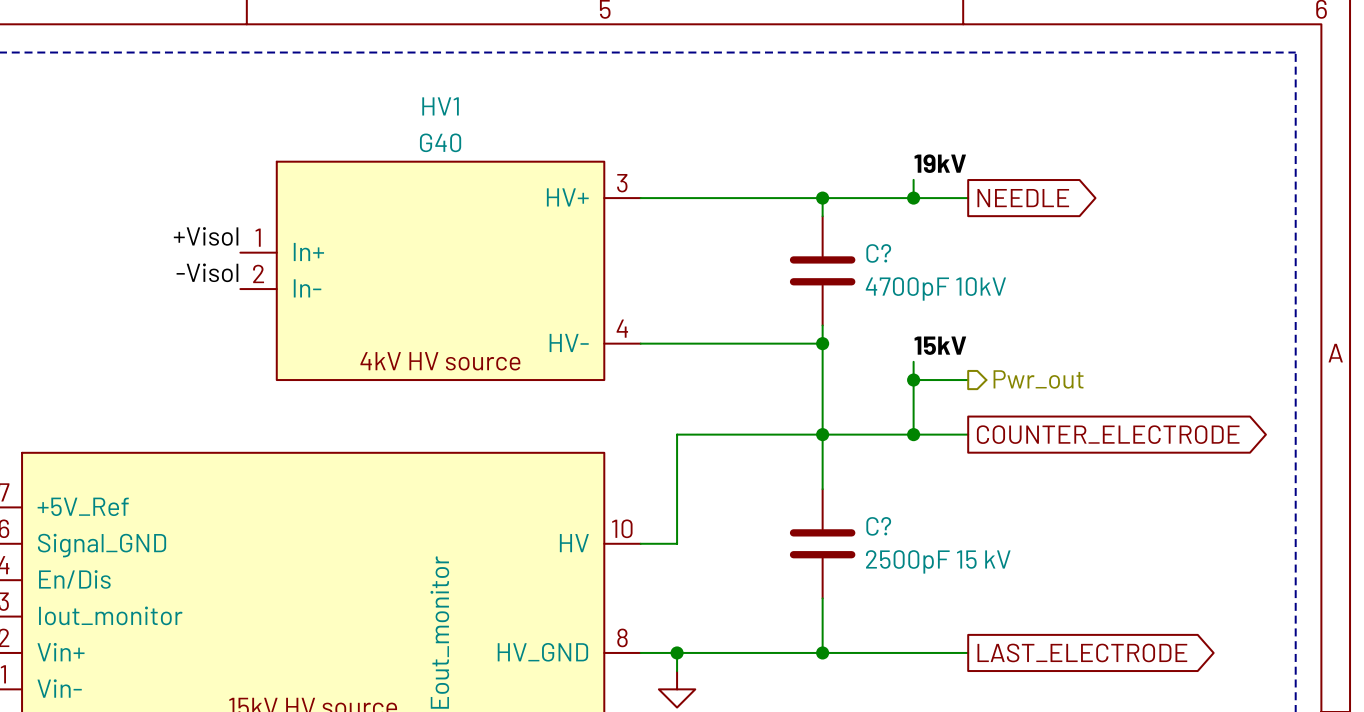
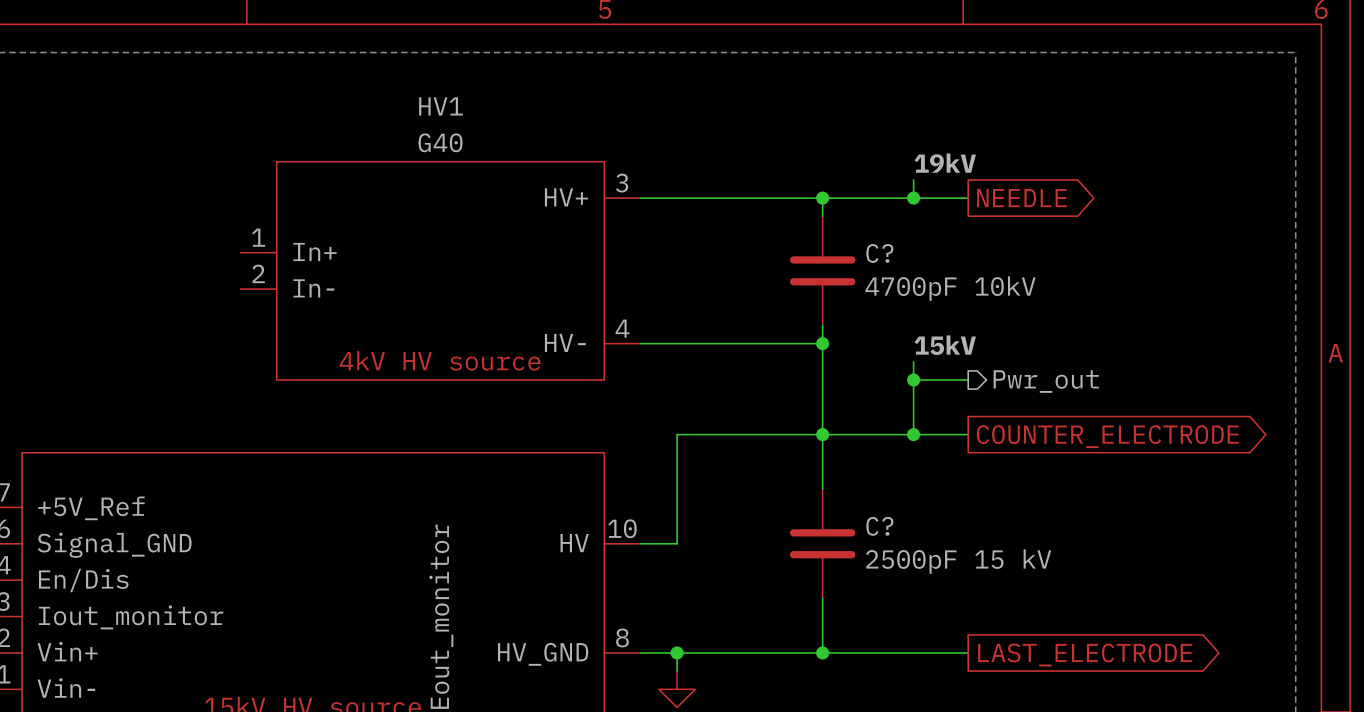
label: +Visol (206, 236) -> none
label: -Visol (207, 272) -> none

